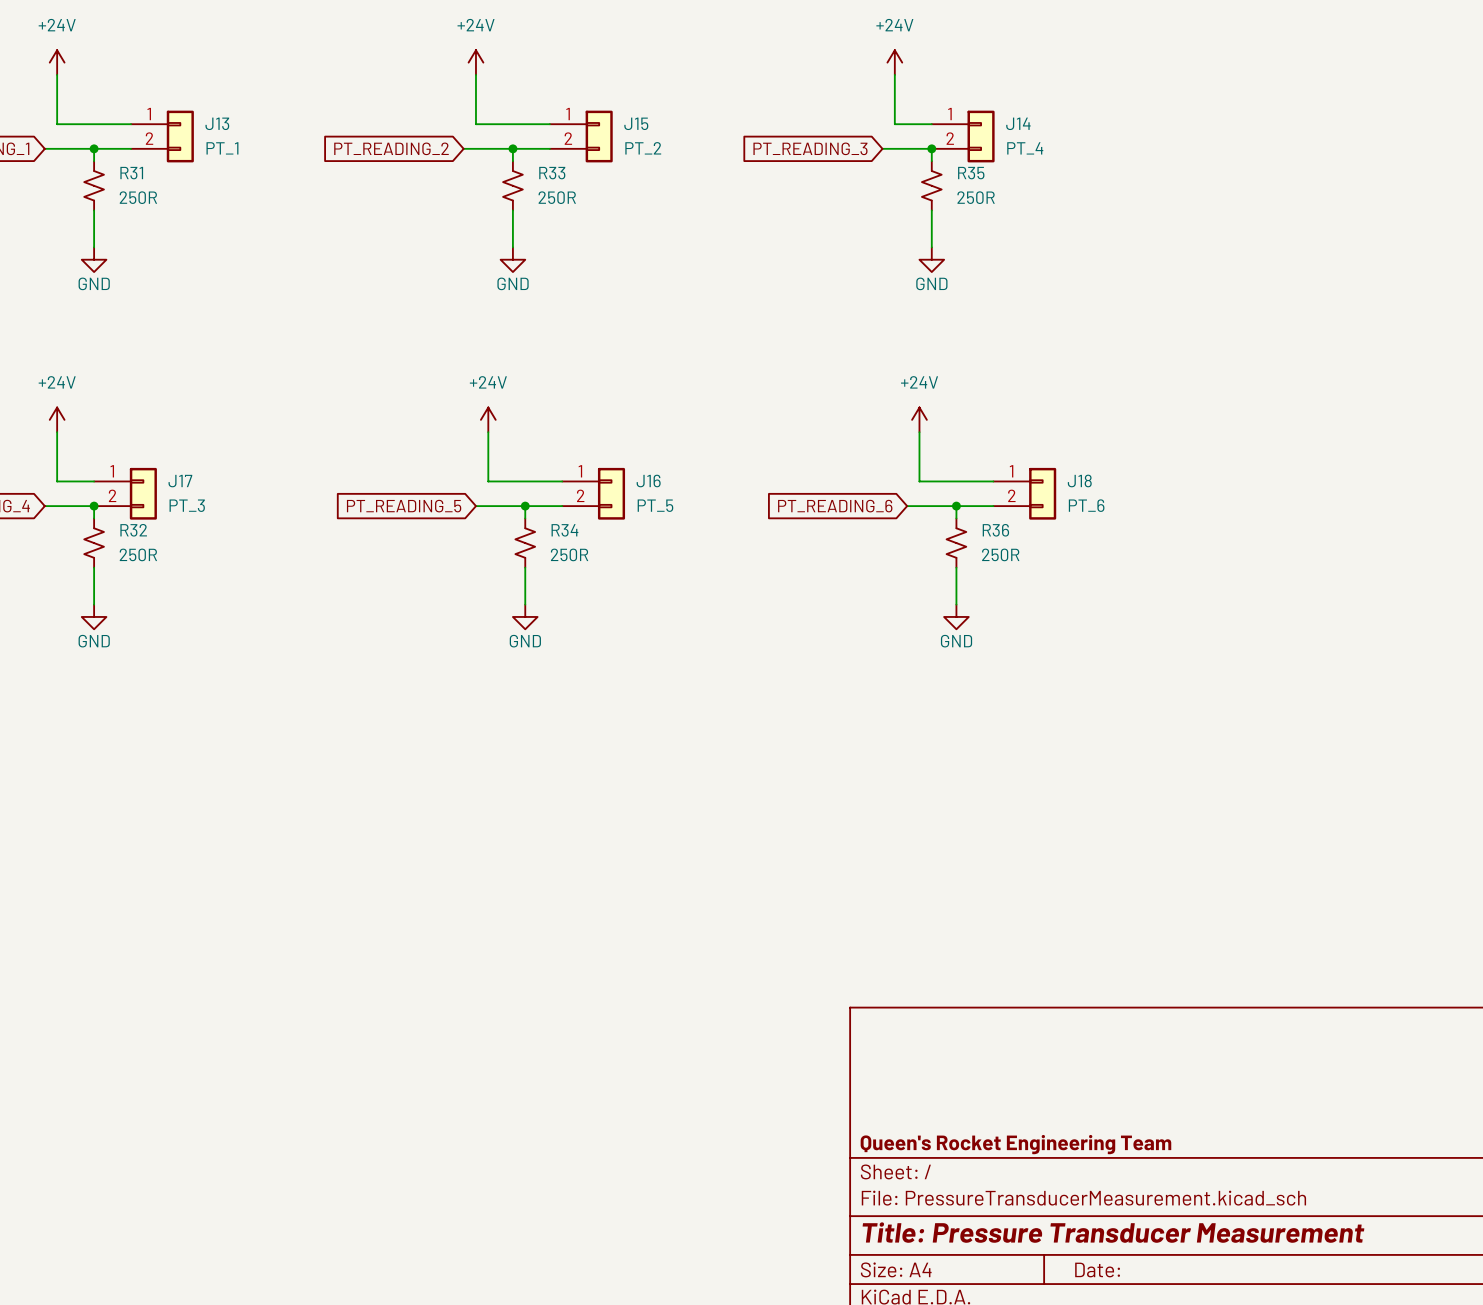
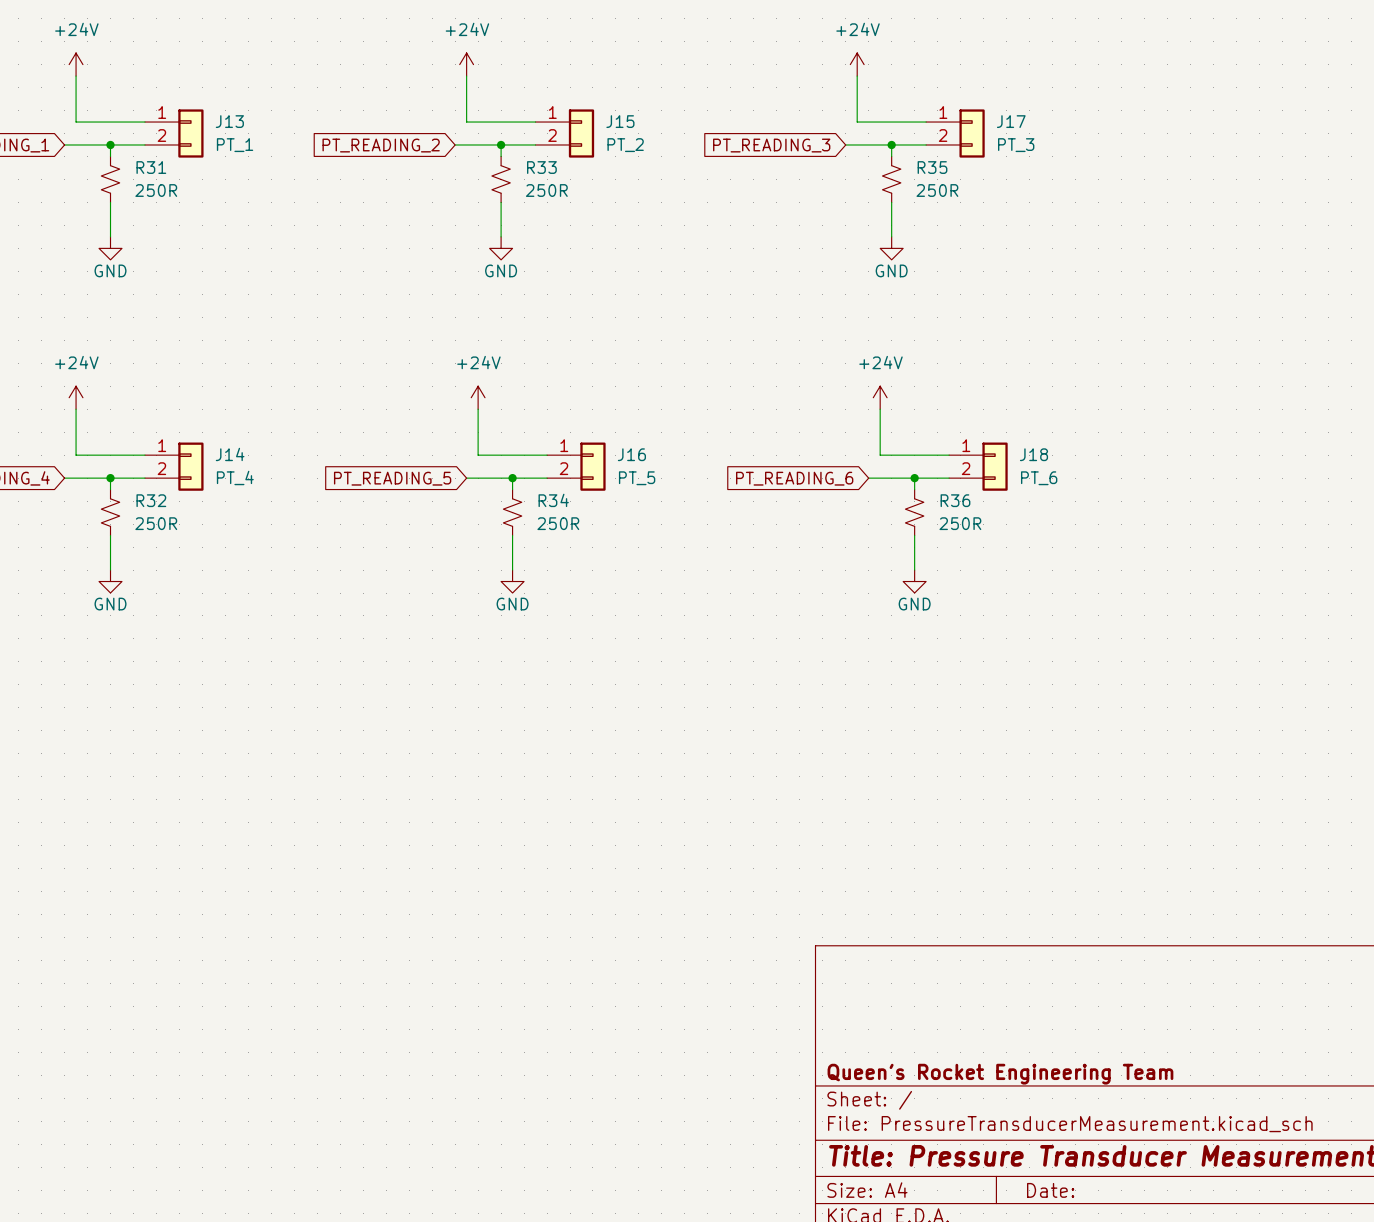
J14 position: (963, 136) -> (174, 466)
J17 position: (125, 493) -> (955, 133)

